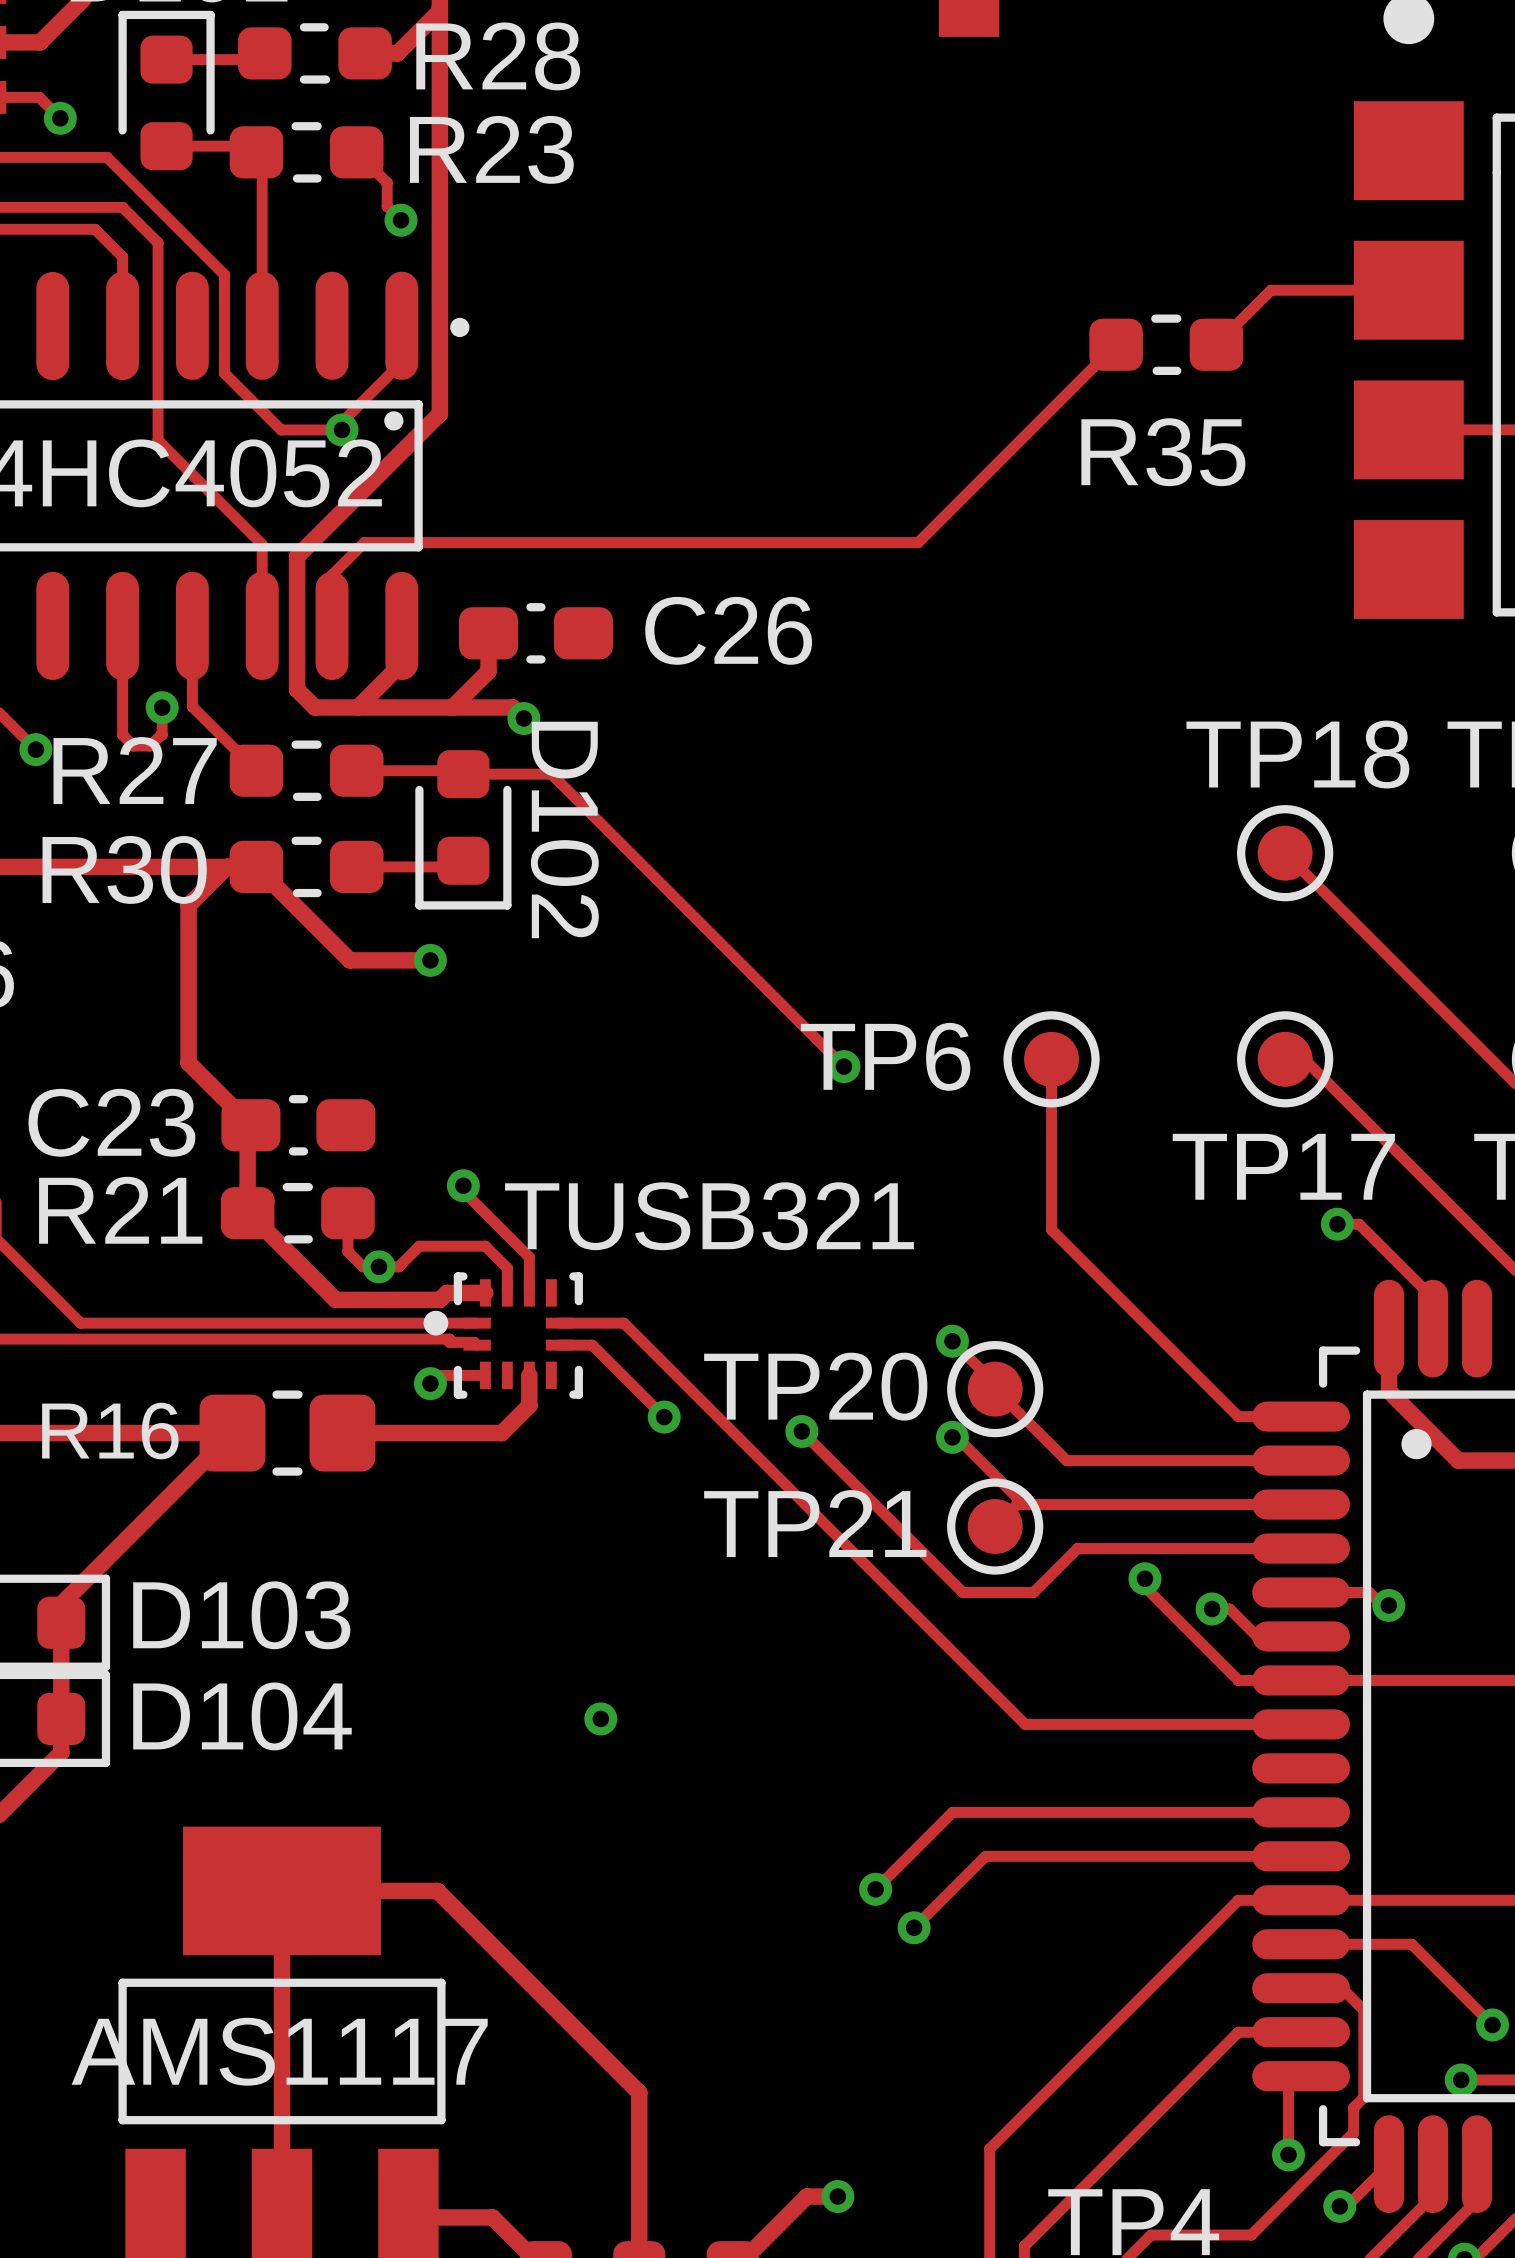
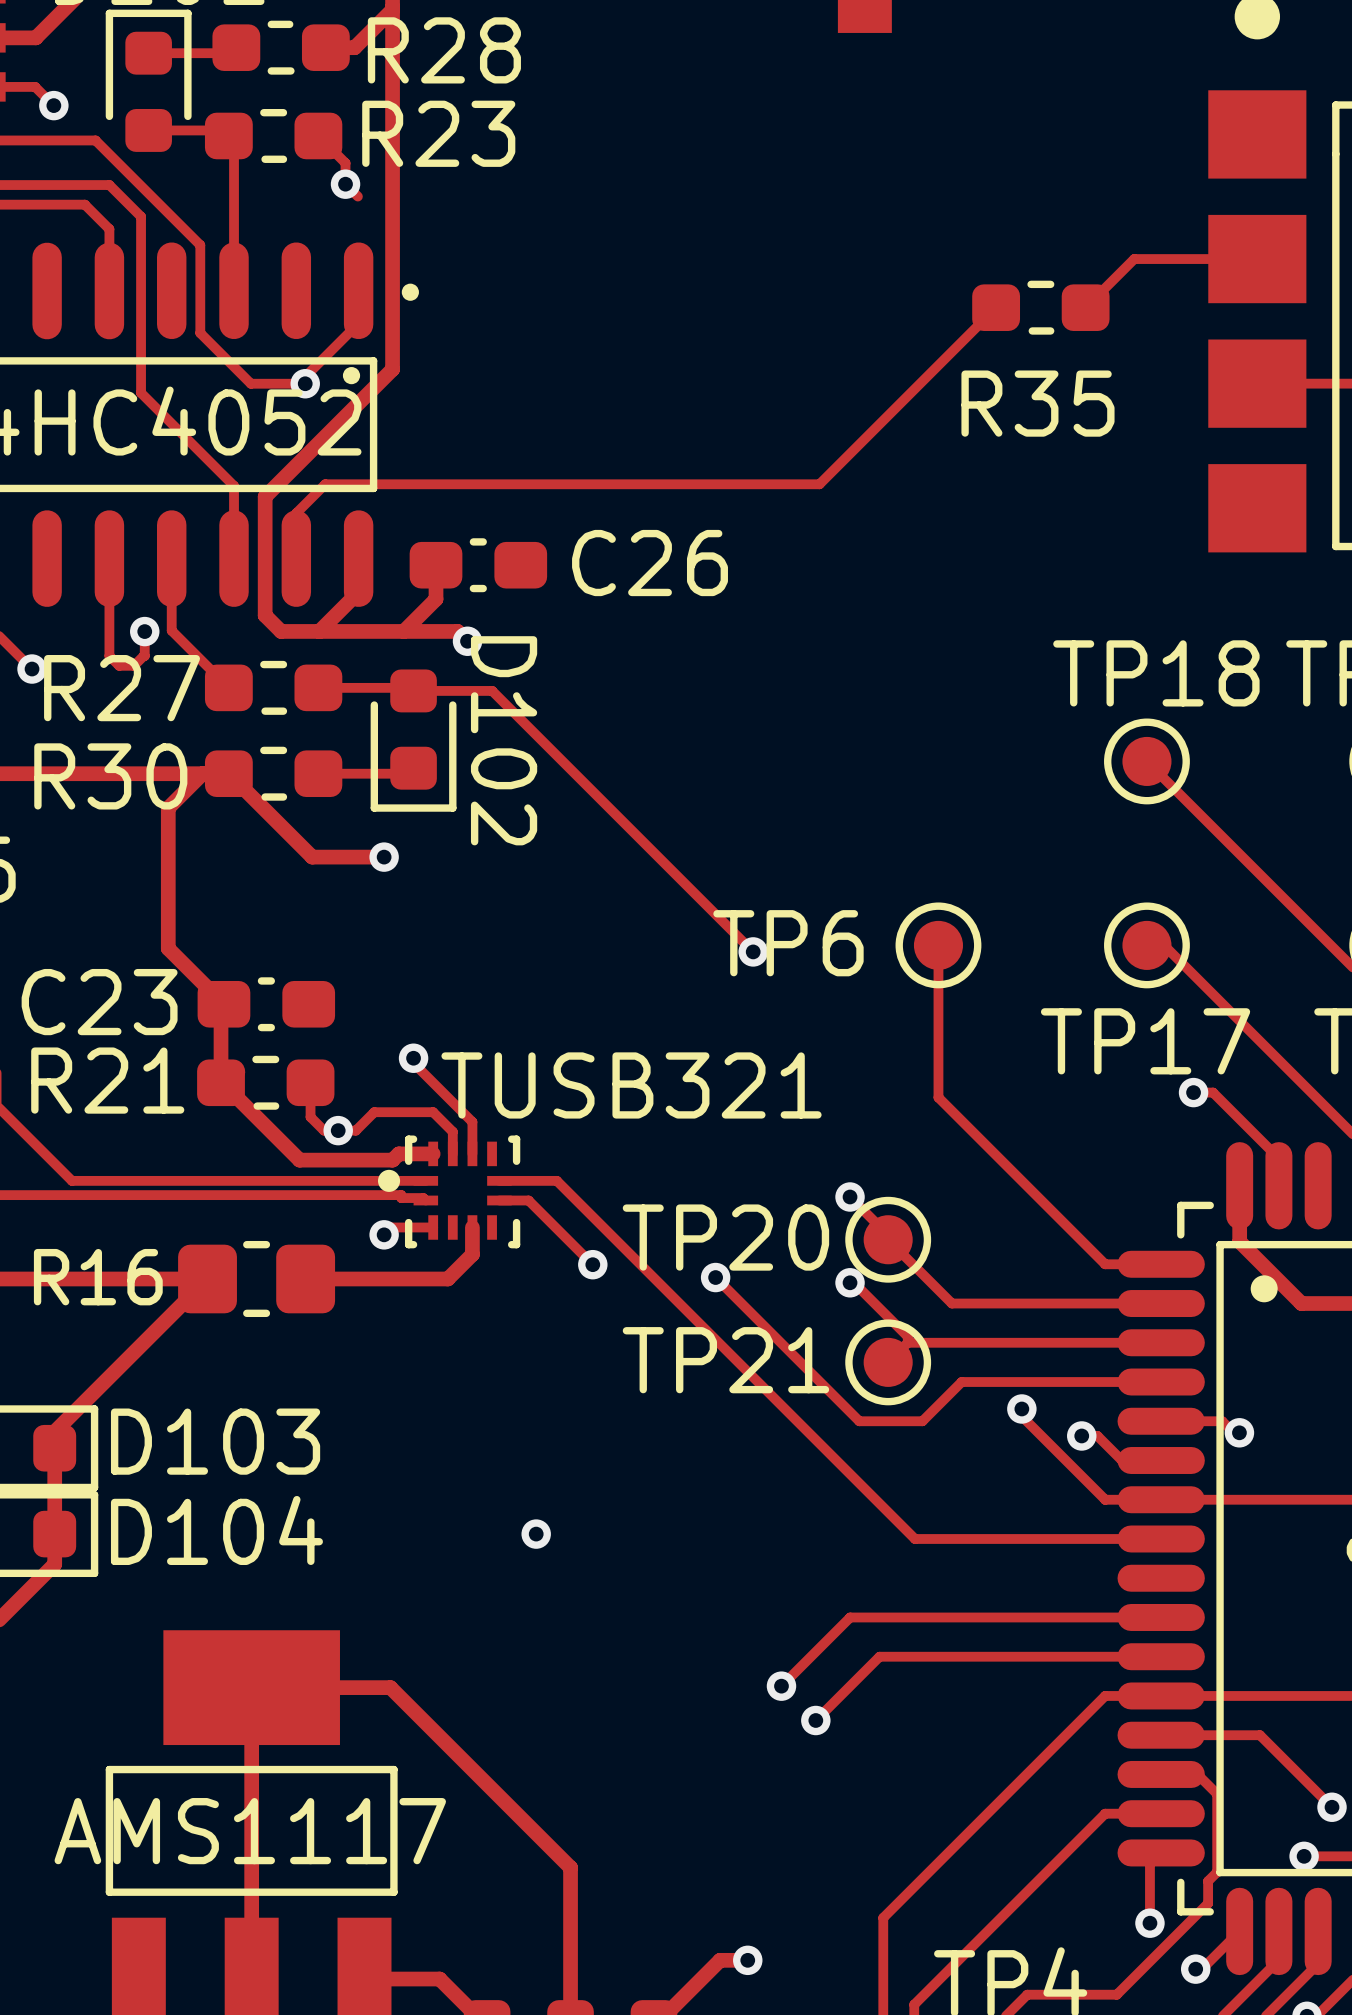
via position: (401, 220) -> (345, 184)

